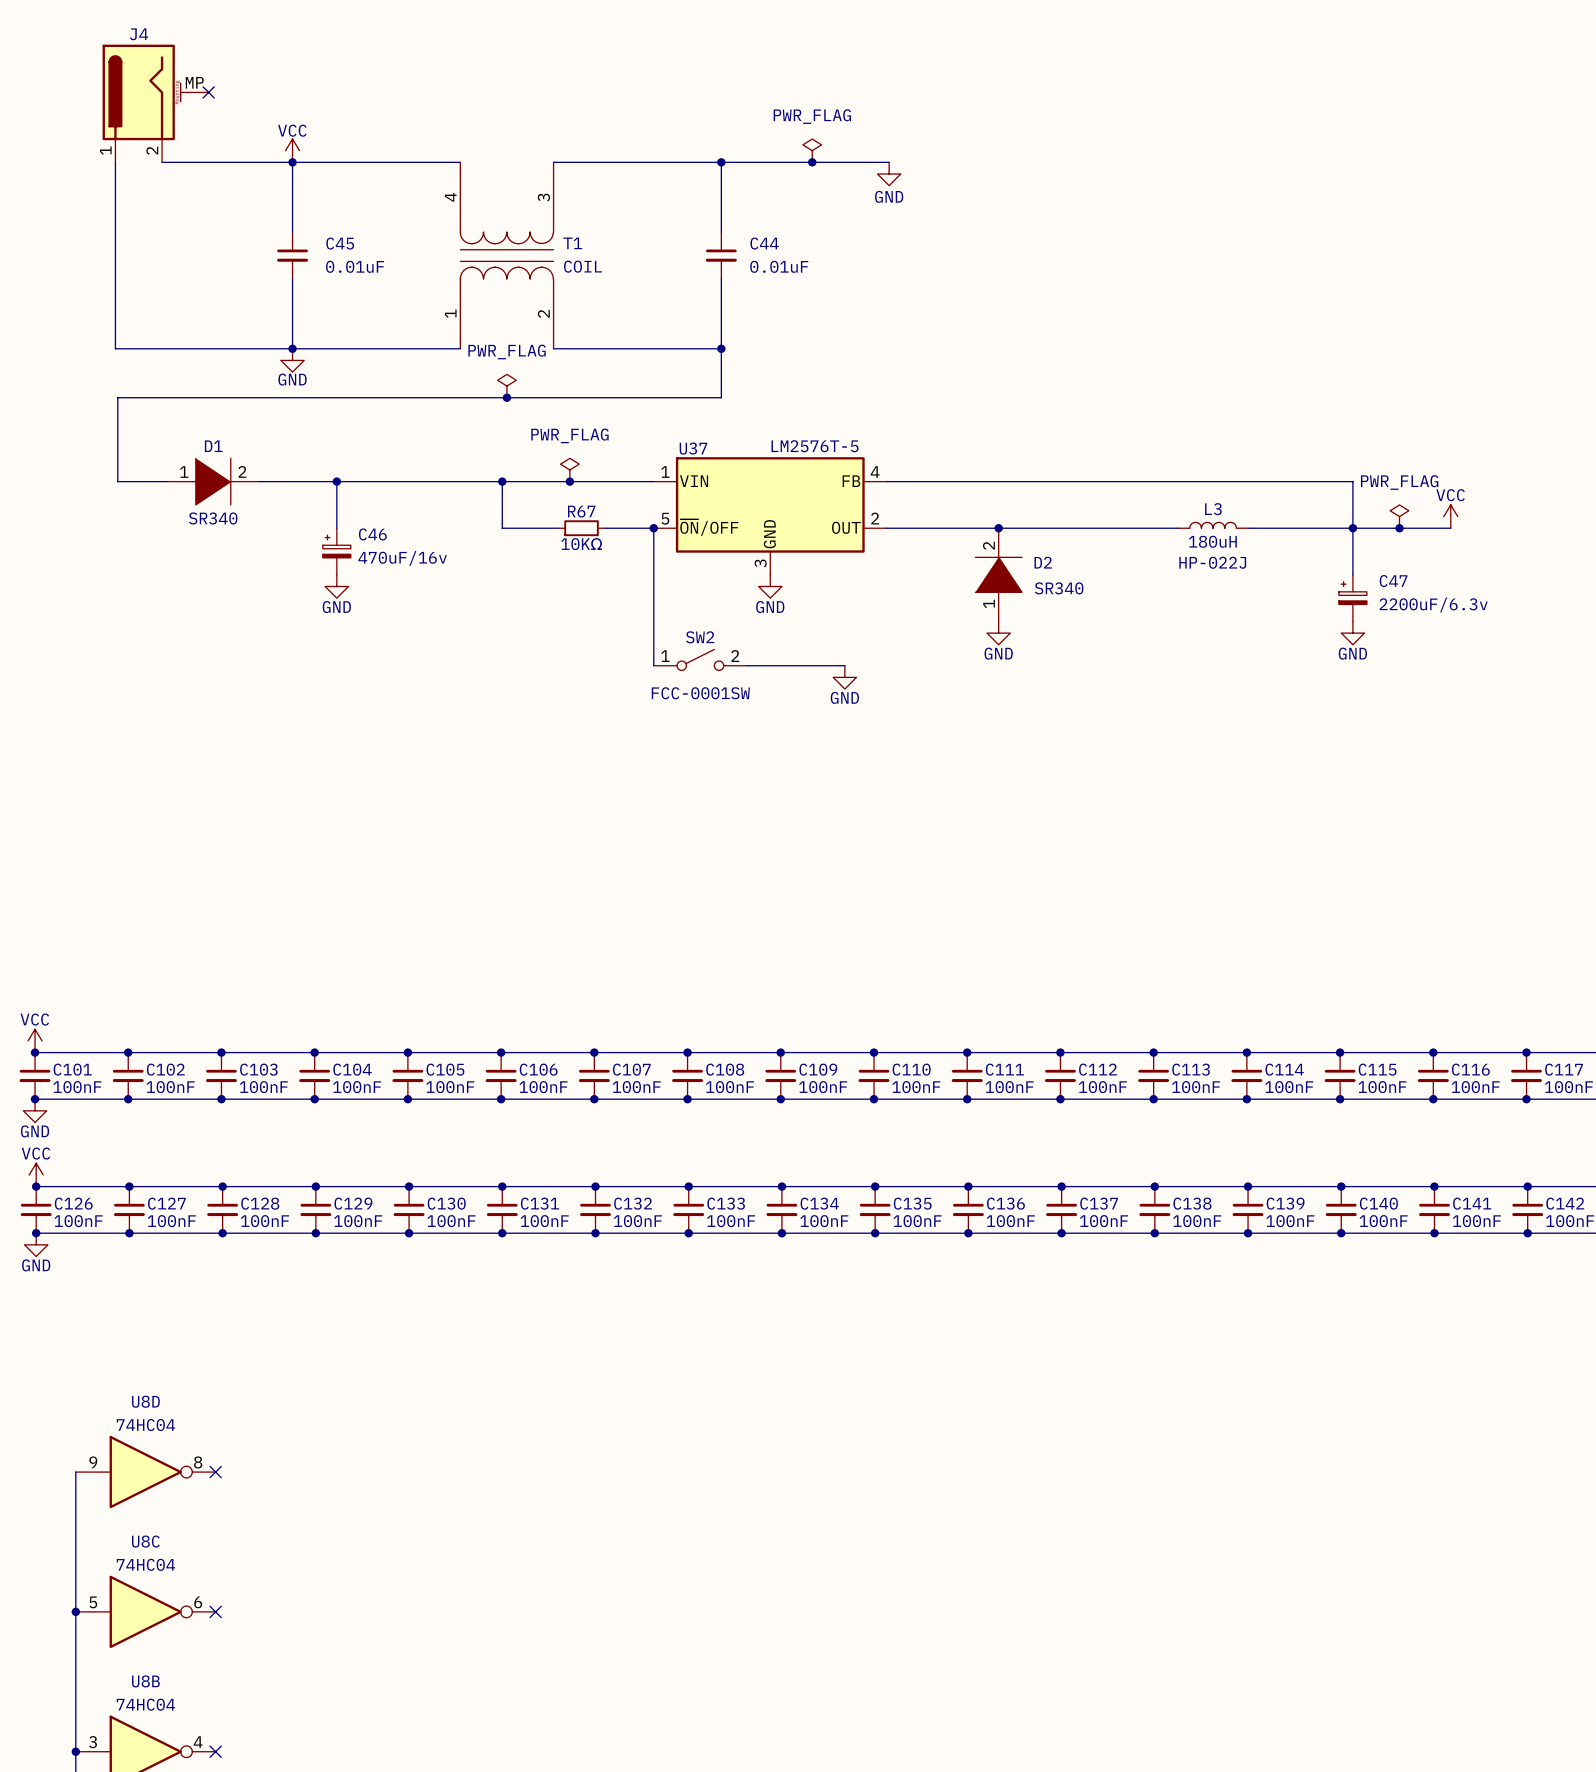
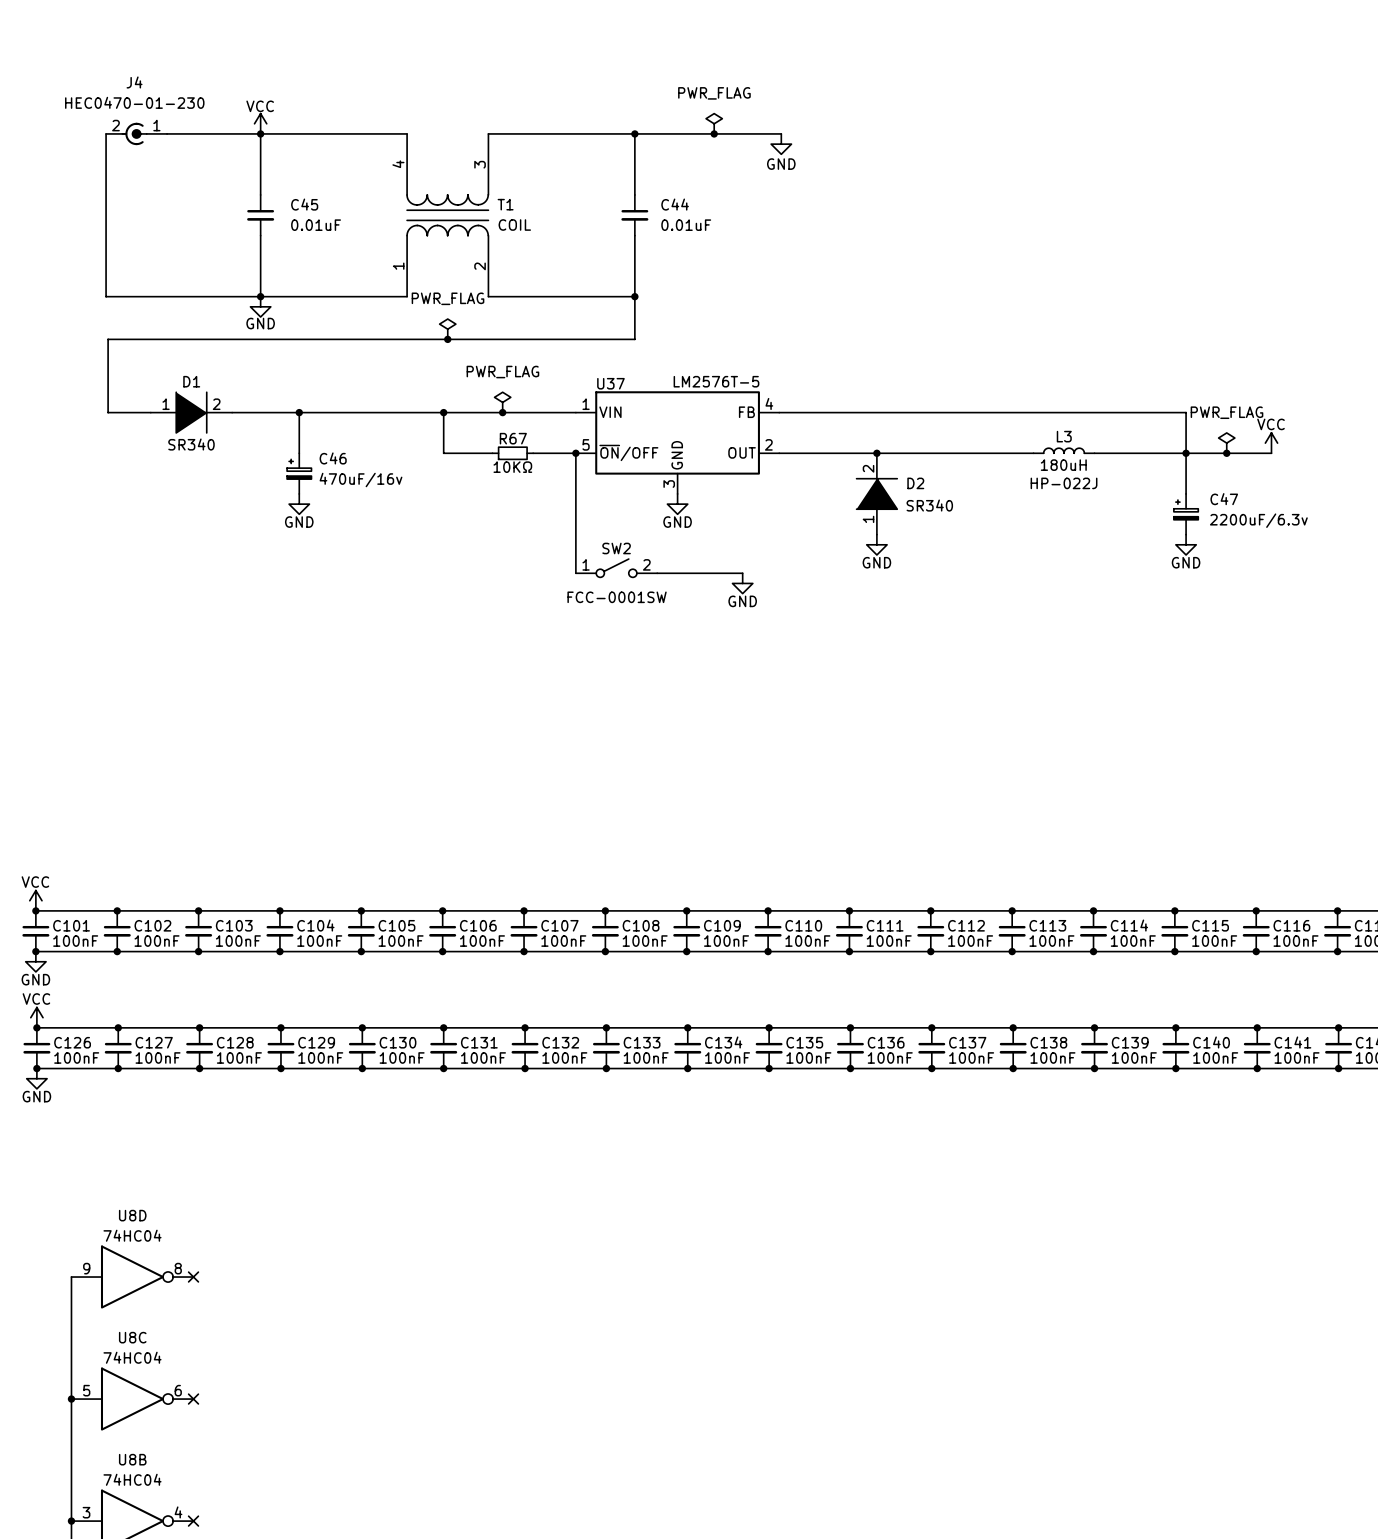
J4 symbol: [102, 44, 209, 163] -> [106, 122, 168, 146]
no-connect mark: (208, 92) -> none
J4 value: none -> HEC0470-01-230 (134, 102)

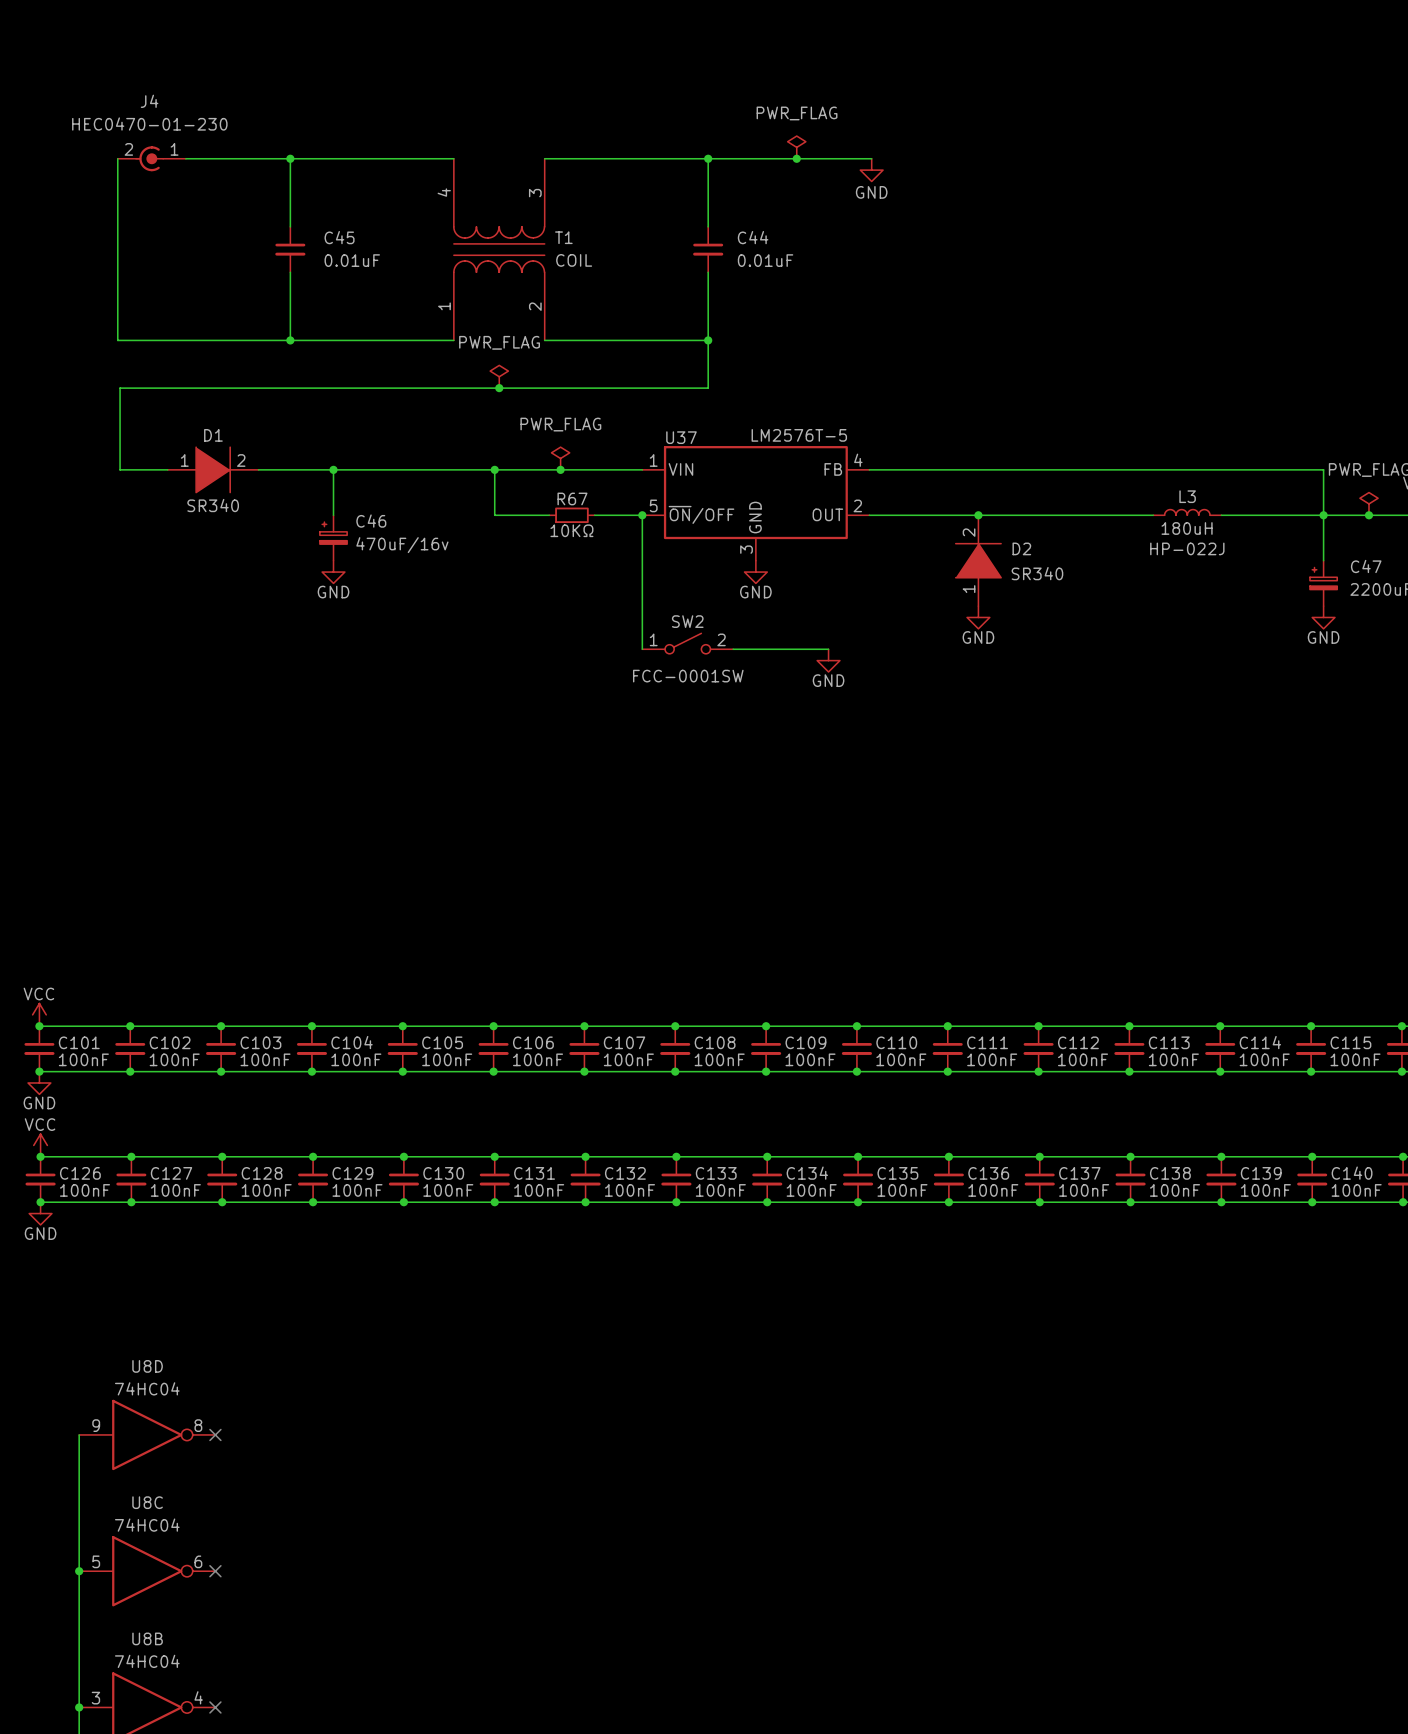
power symbol: VCC (260, 123) -> none
power symbol: GND (260, 306) -> none

